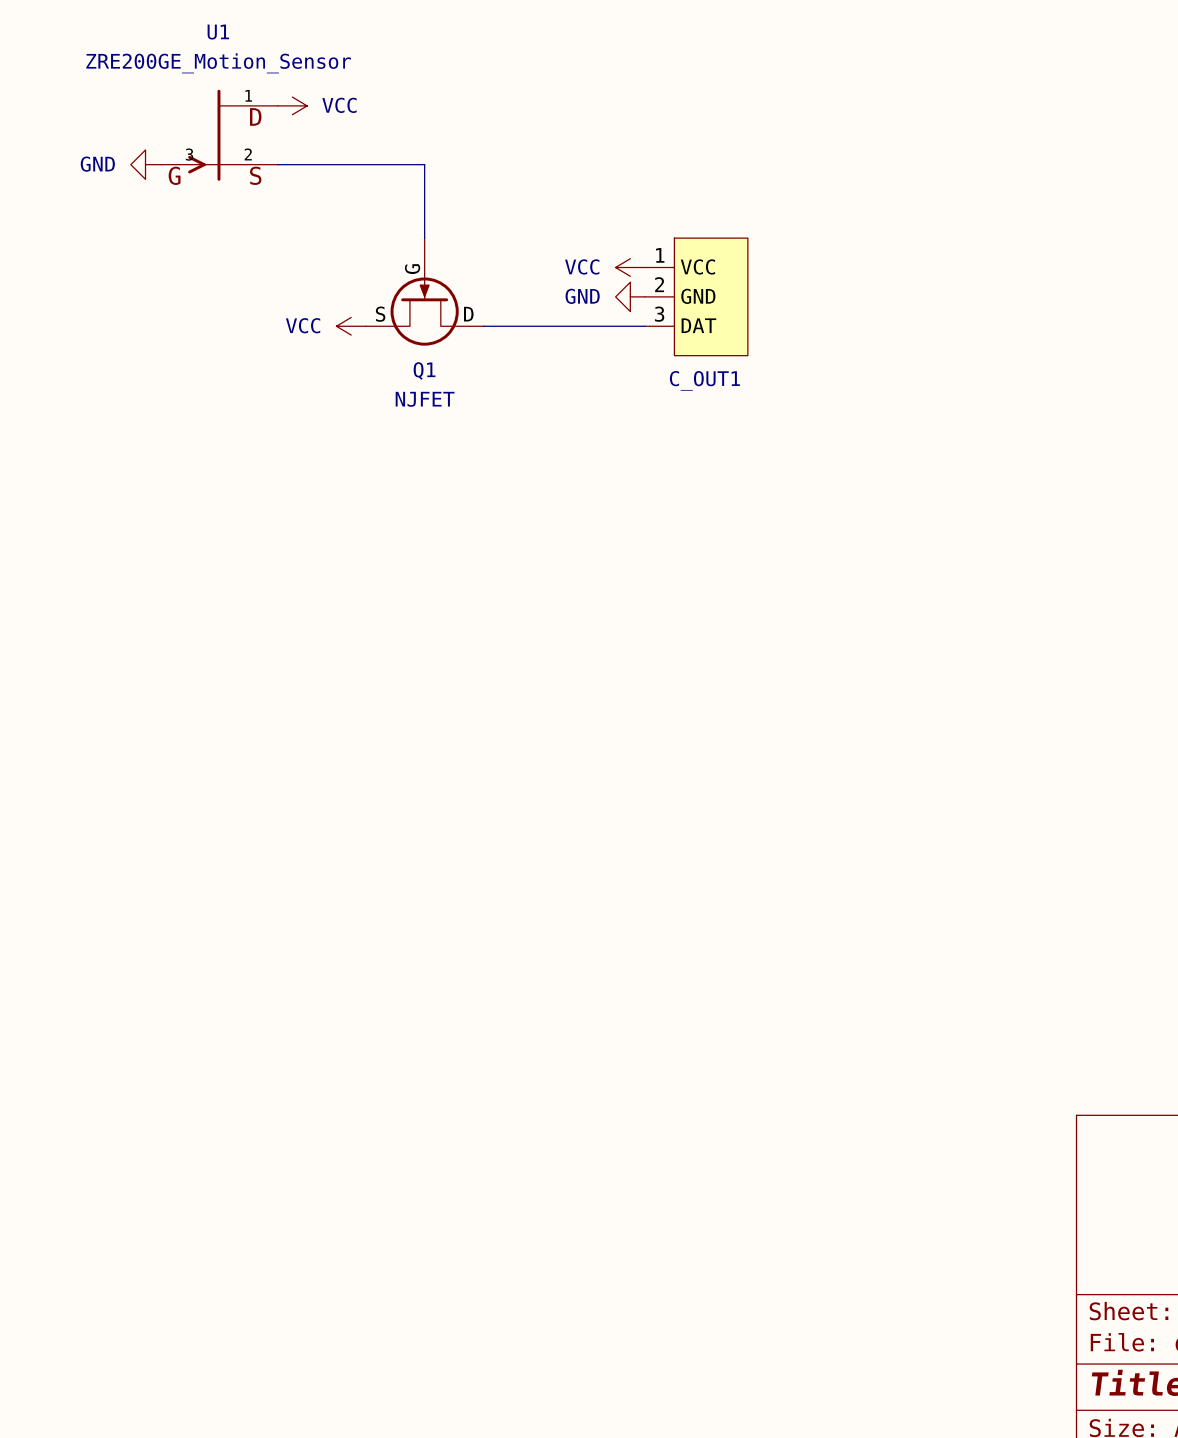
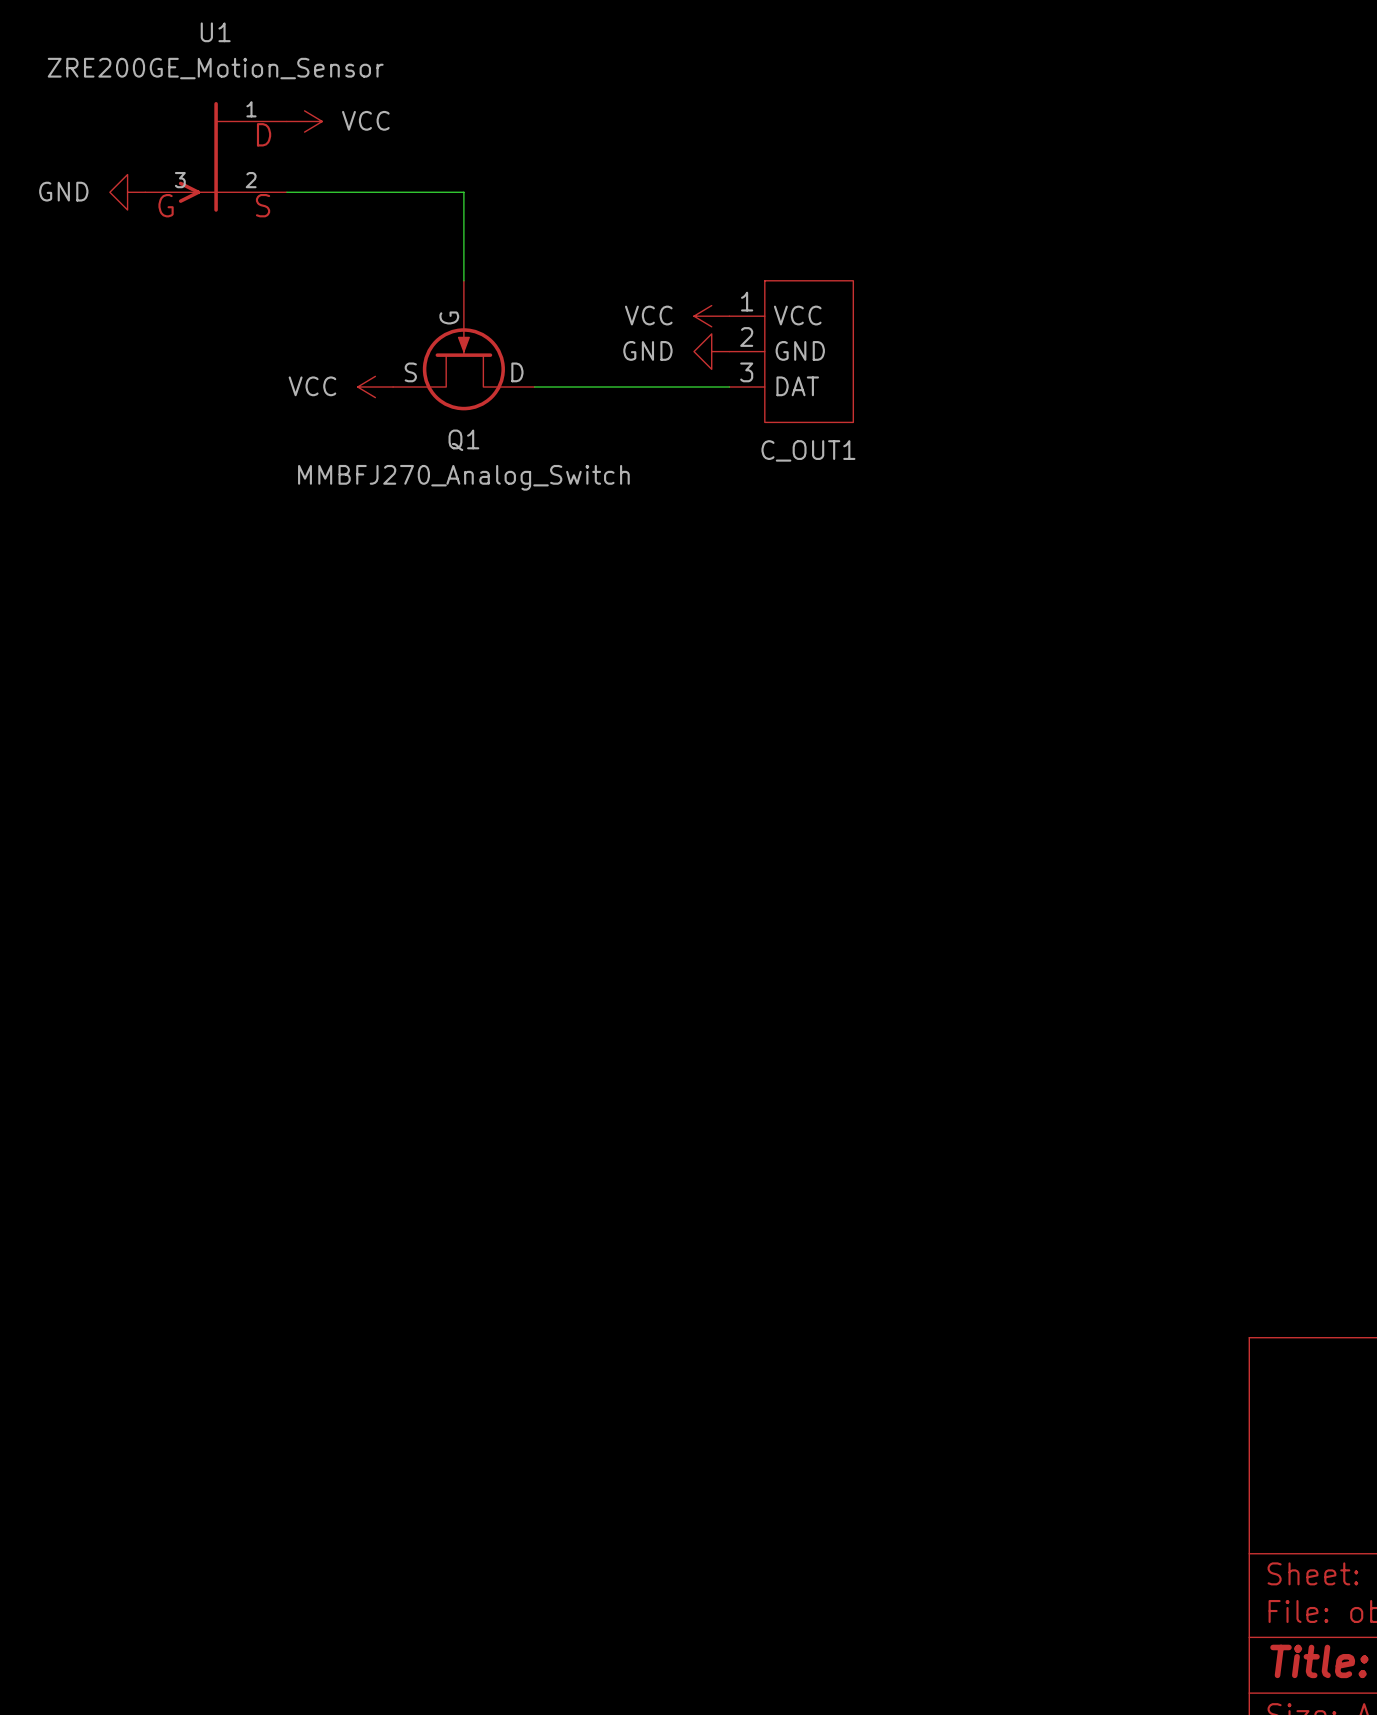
Q1 value: NJFET (425, 399) -> MMBFJ270_Analog_Switch (463, 477)

